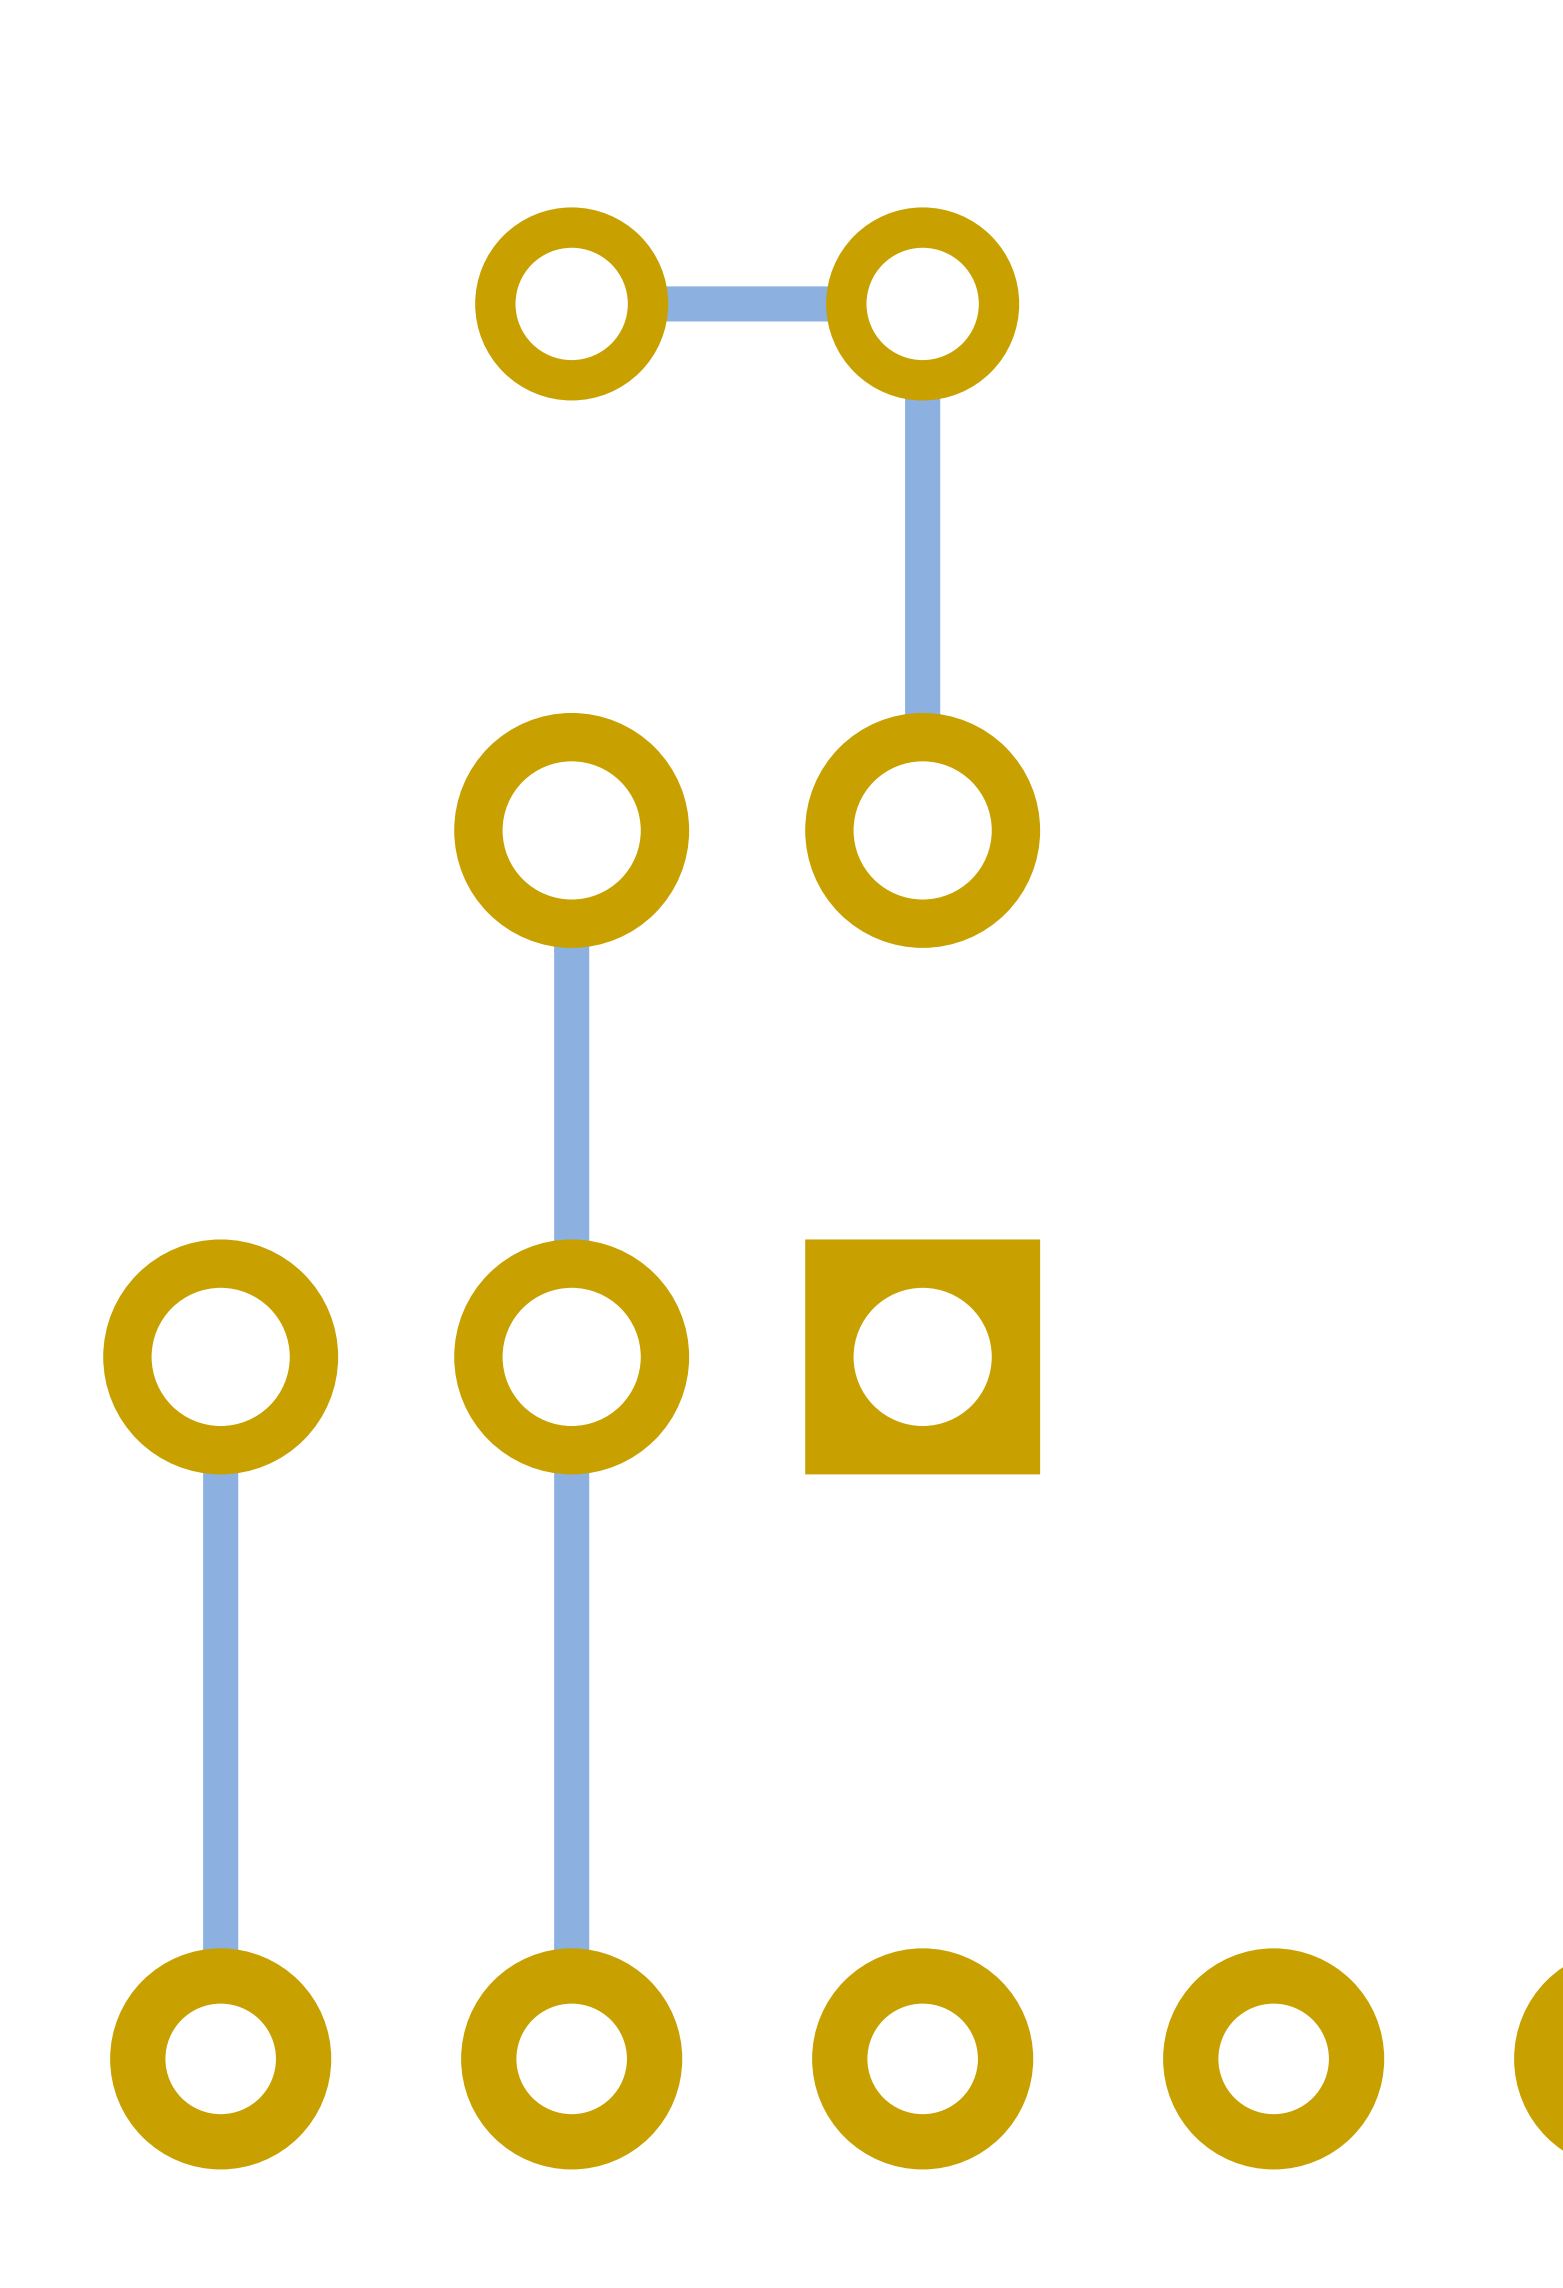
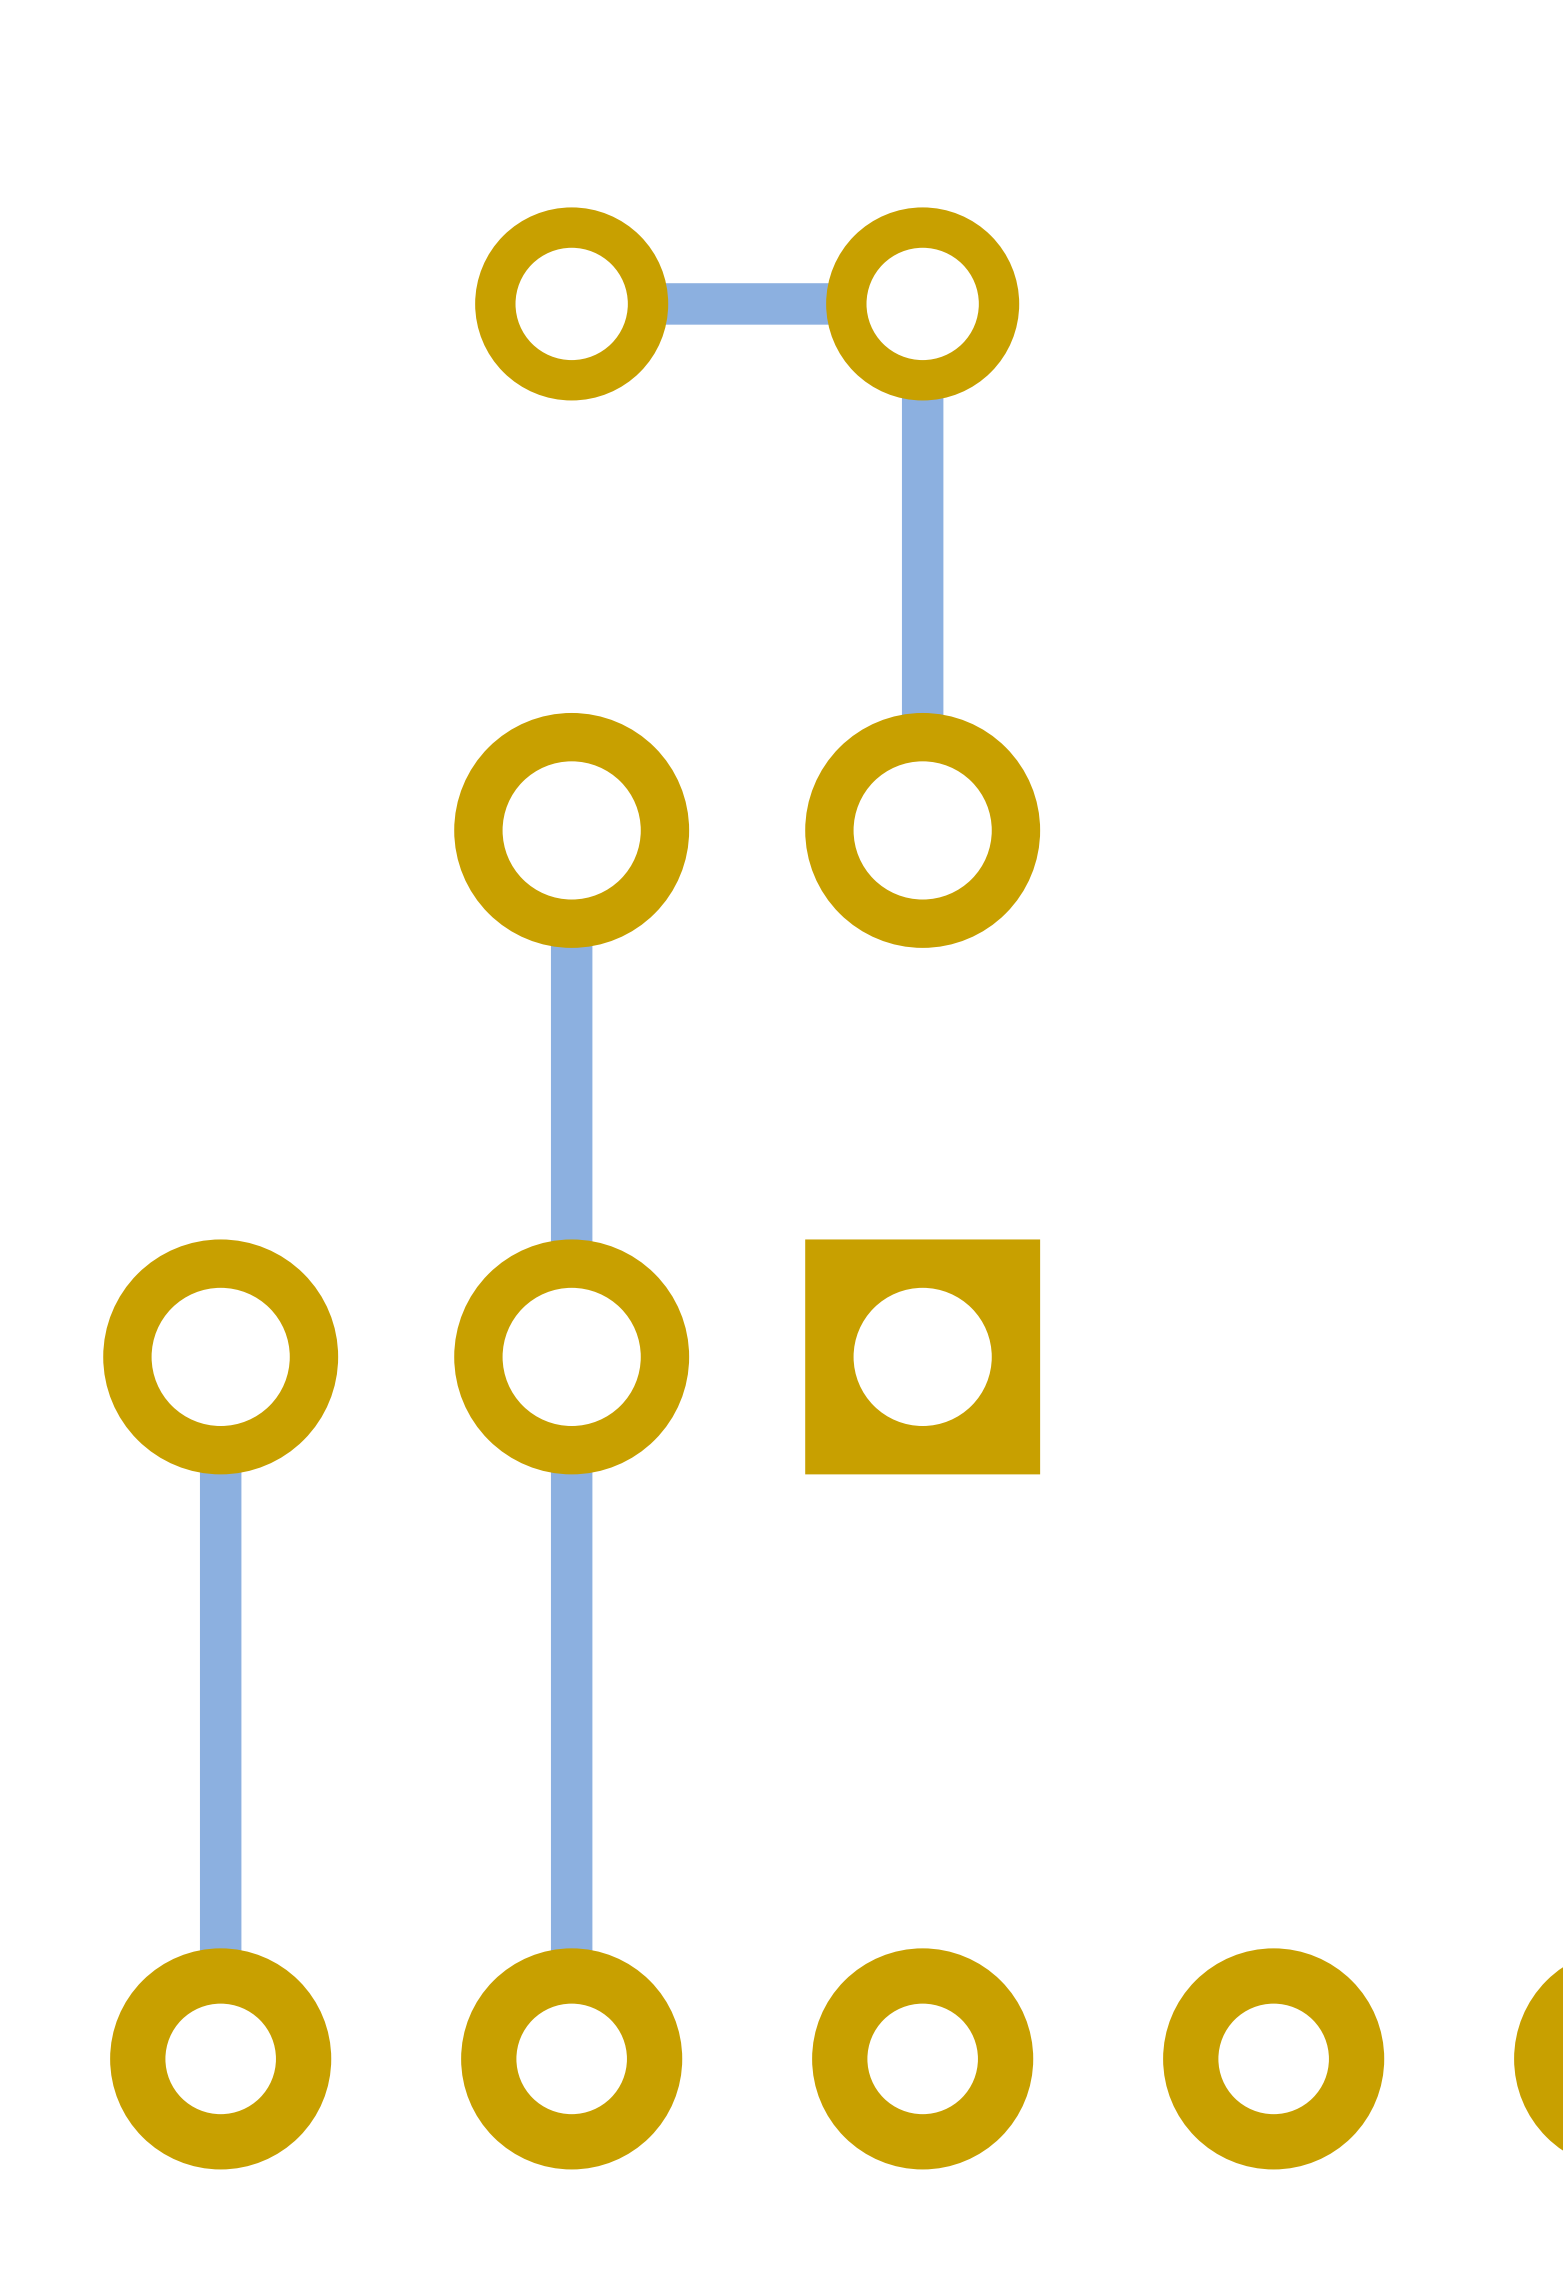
track width: thin (571, 303) (922, 303) (922, 830) -> thick (571, 303) (922, 303) (922, 830)
track width: thin (571, 830) (571, 2058) -> thick (571, 830) (571, 2058)
track width: thin (220, 1356) (220, 2058) -> thick (220, 1356) (220, 2058)

